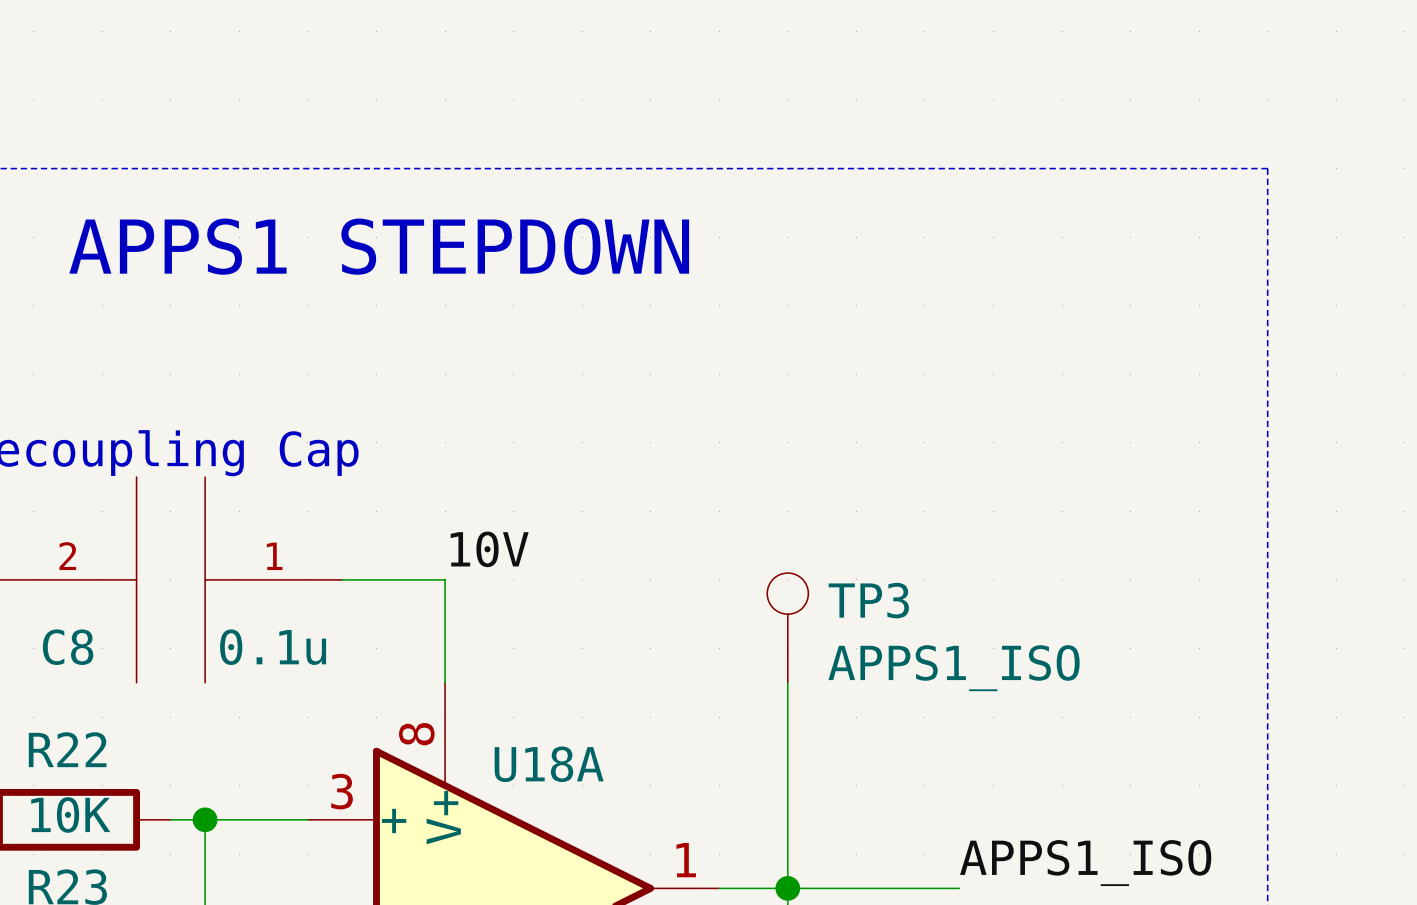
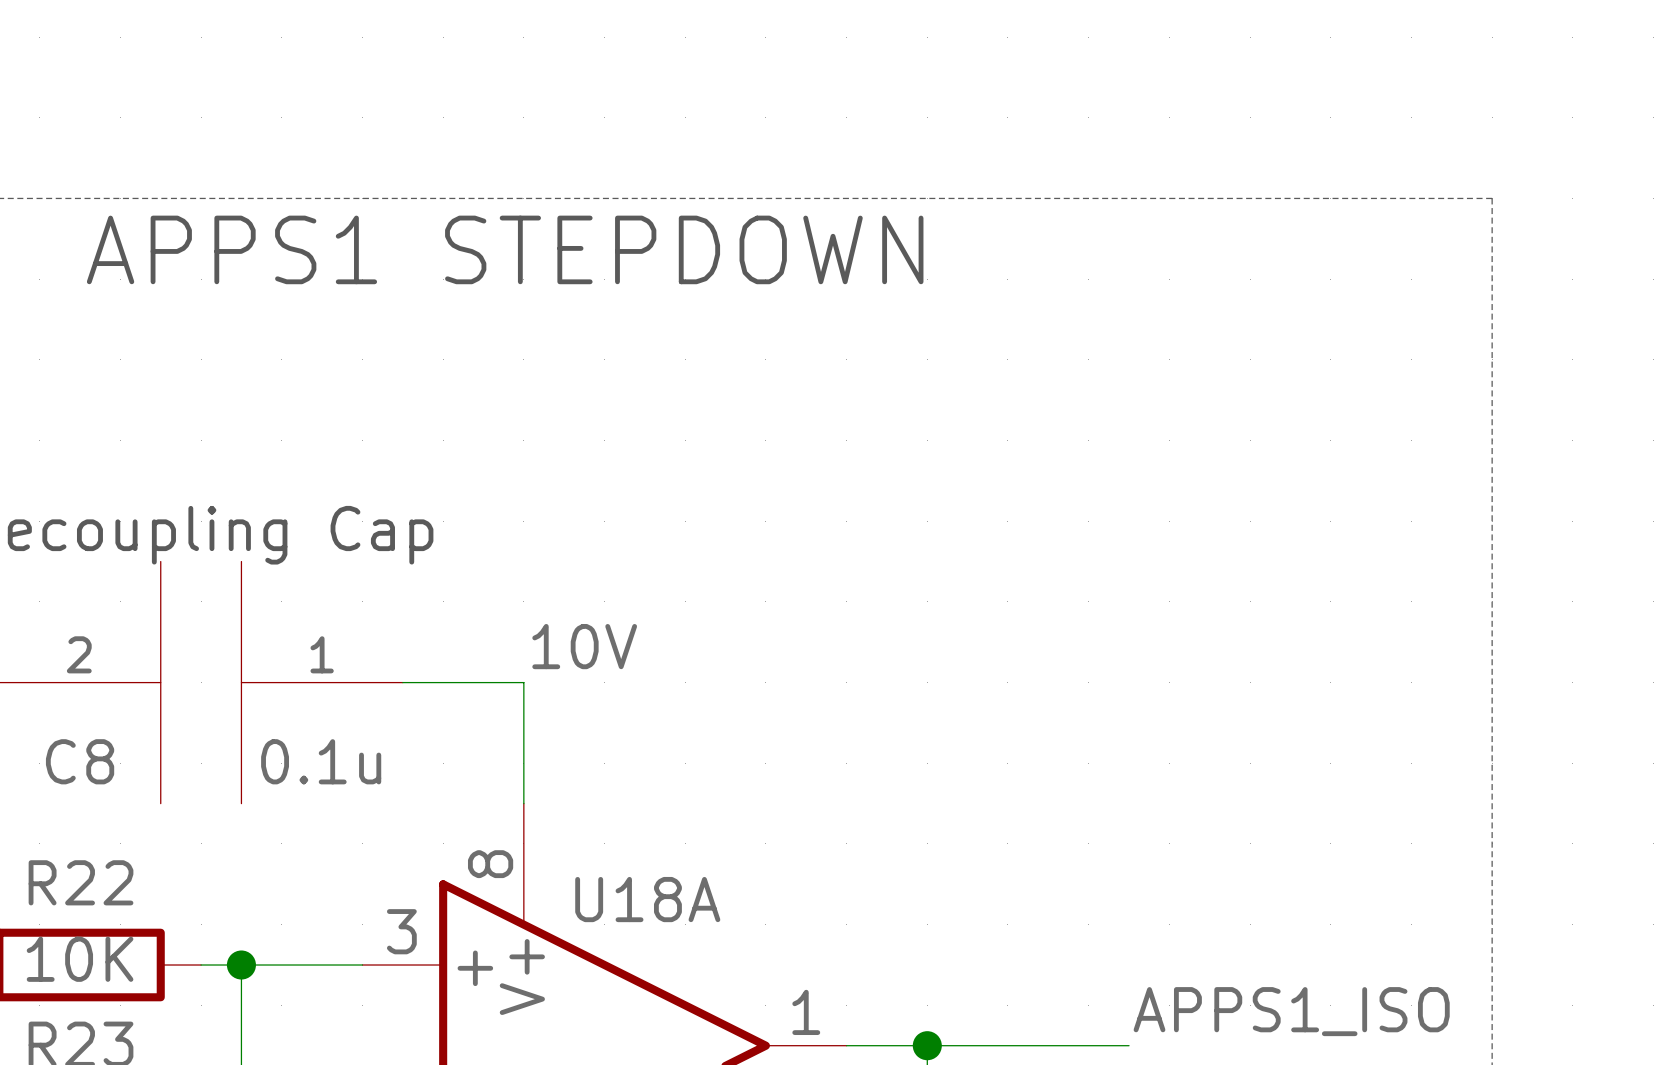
text position: APPS1 STEPDOWN (379, 246) -> APPS1 STEPDOWN (505, 249)
TP3: APPS1_ISO (787, 627) -> none
wire: (787, 682) (787, 888) -> none

